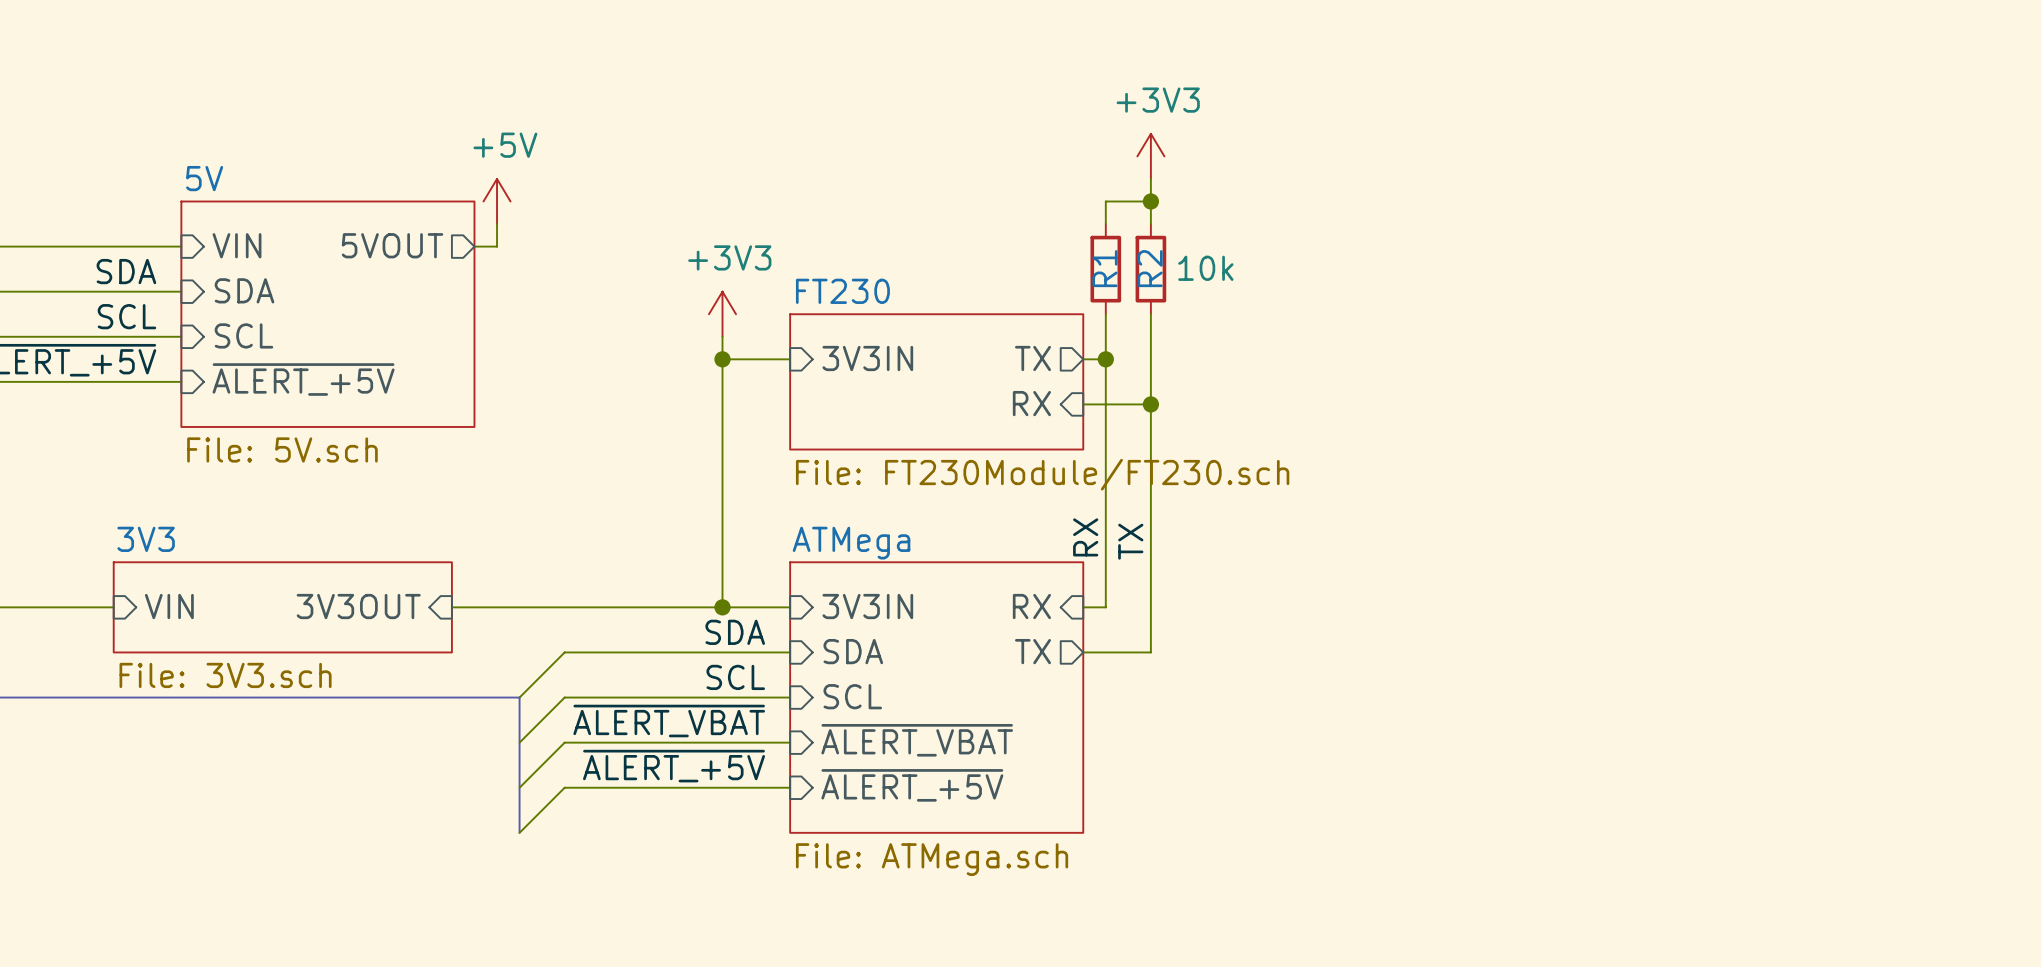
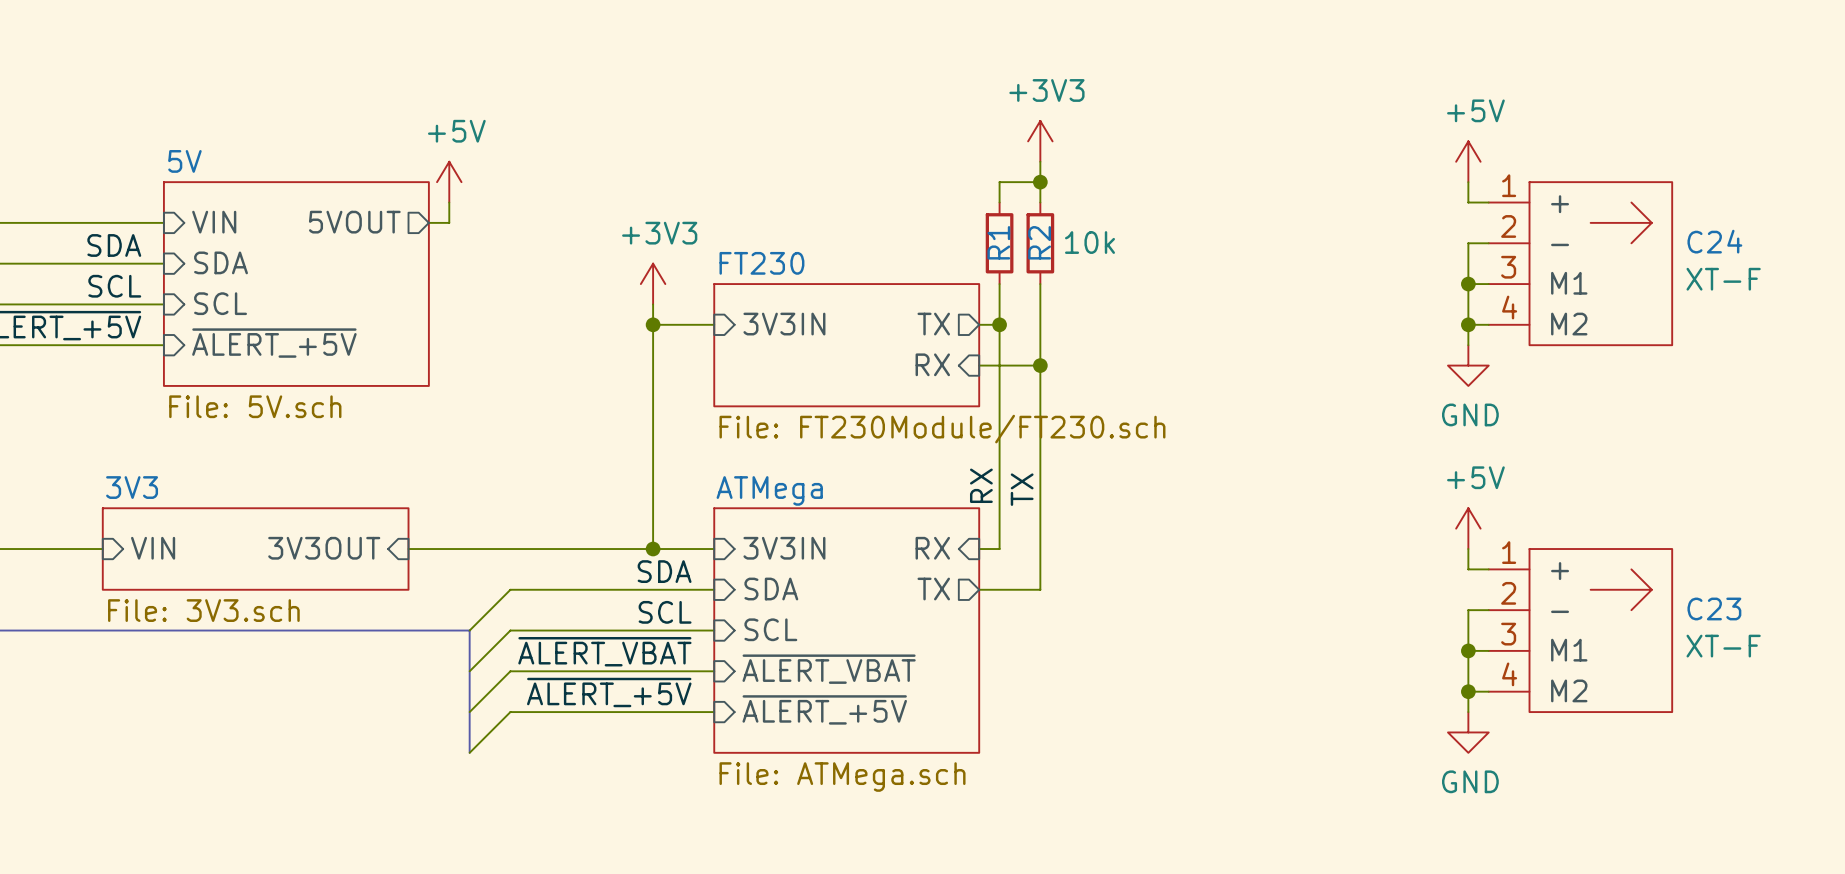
power symbol: none -> +5V (1468, 161)
wire: none -> (1468, 182) (1468, 202) (1488, 202)
wire: none -> (1488, 243) (1468, 243) (1468, 345)
C24: none -> XT-F (1580, 263)
wire: none -> (1468, 284) (1488, 284)
junction: none -> (1468, 284)
wire: none -> (1468, 324) (1488, 324)
junction: none -> (1468, 324)
power symbol: none -> GND (1468, 365)
power symbol: none -> +5V (1468, 528)
wire: none -> (1468, 549) (1468, 569) (1488, 569)
wire: none -> (1488, 610) (1468, 610) (1468, 712)
C23: none -> XT-F (1580, 630)
wire: none -> (1468, 650) (1488, 650)
junction: none -> (1468, 650)
wire: none -> (1468, 691) (1488, 691)
junction: none -> (1468, 691)
power symbol: none -> GND (1468, 732)

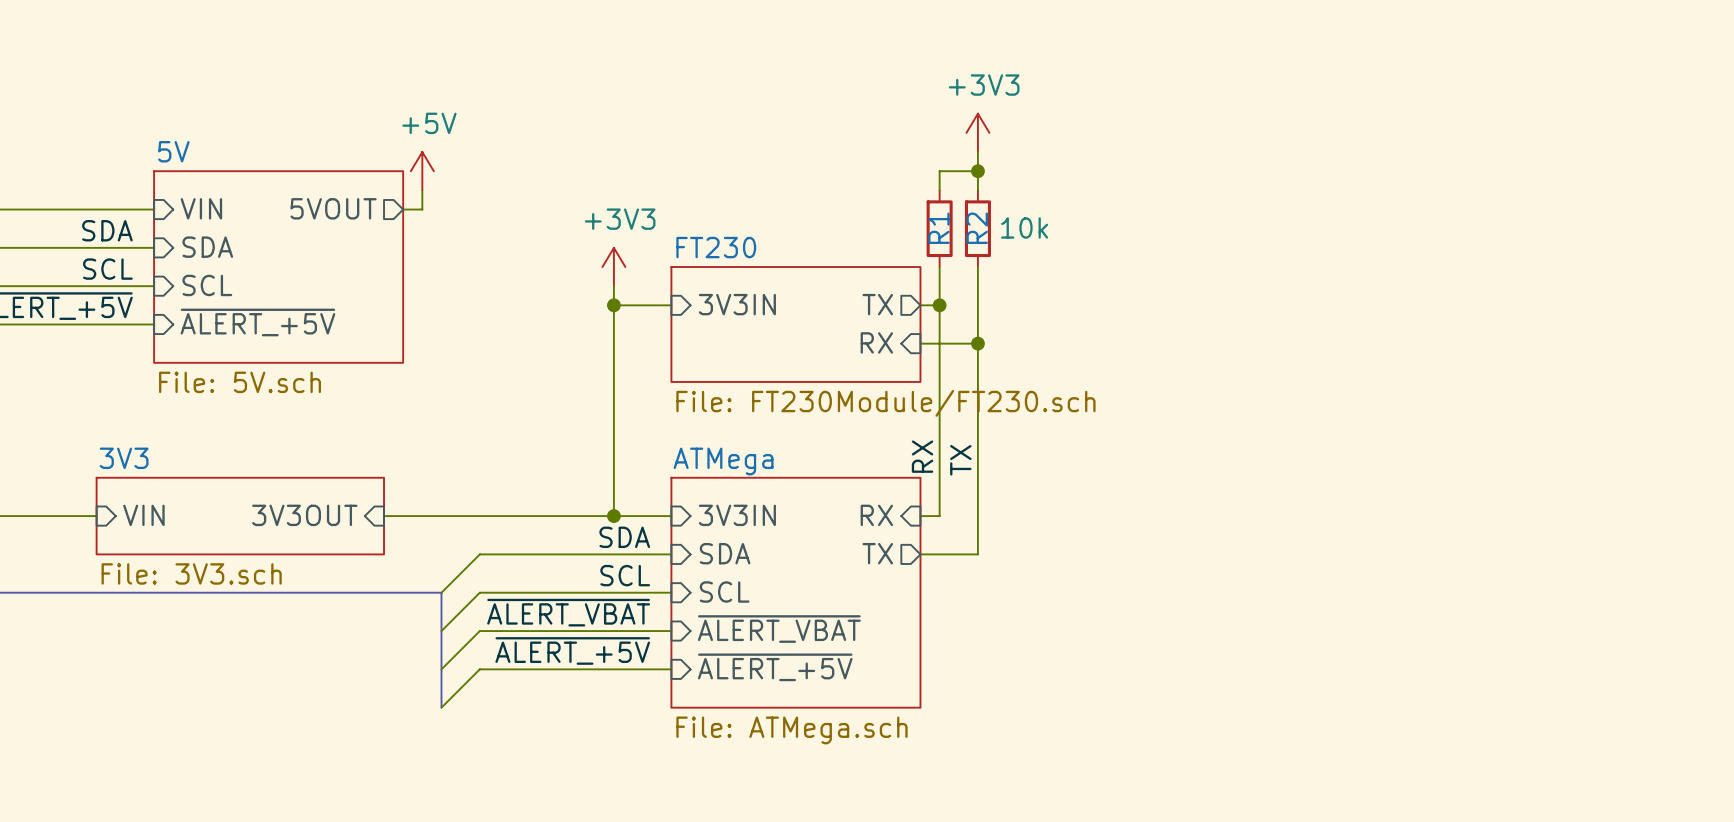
power symbol: +5V (1468, 161) -> none
wire: (1468, 182) (1468, 202) (1488, 202) -> none
wire: (1488, 243) (1468, 243) (1468, 345) -> none
C24: XT-F (1580, 263) -> none
wire: (1468, 284) (1488, 284) -> none
junction: (1468, 284) -> none
wire: (1468, 324) (1488, 324) -> none
junction: (1468, 324) -> none
power symbol: GND (1468, 365) -> none
power symbol: +5V (1468, 528) -> none
wire: (1468, 549) (1468, 569) (1488, 569) -> none
wire: (1488, 610) (1468, 610) (1468, 712) -> none
C23: XT-F (1580, 630) -> none
wire: (1468, 650) (1488, 650) -> none
junction: (1468, 650) -> none
wire: (1468, 691) (1488, 691) -> none
junction: (1468, 691) -> none
power symbol: GND (1468, 732) -> none

